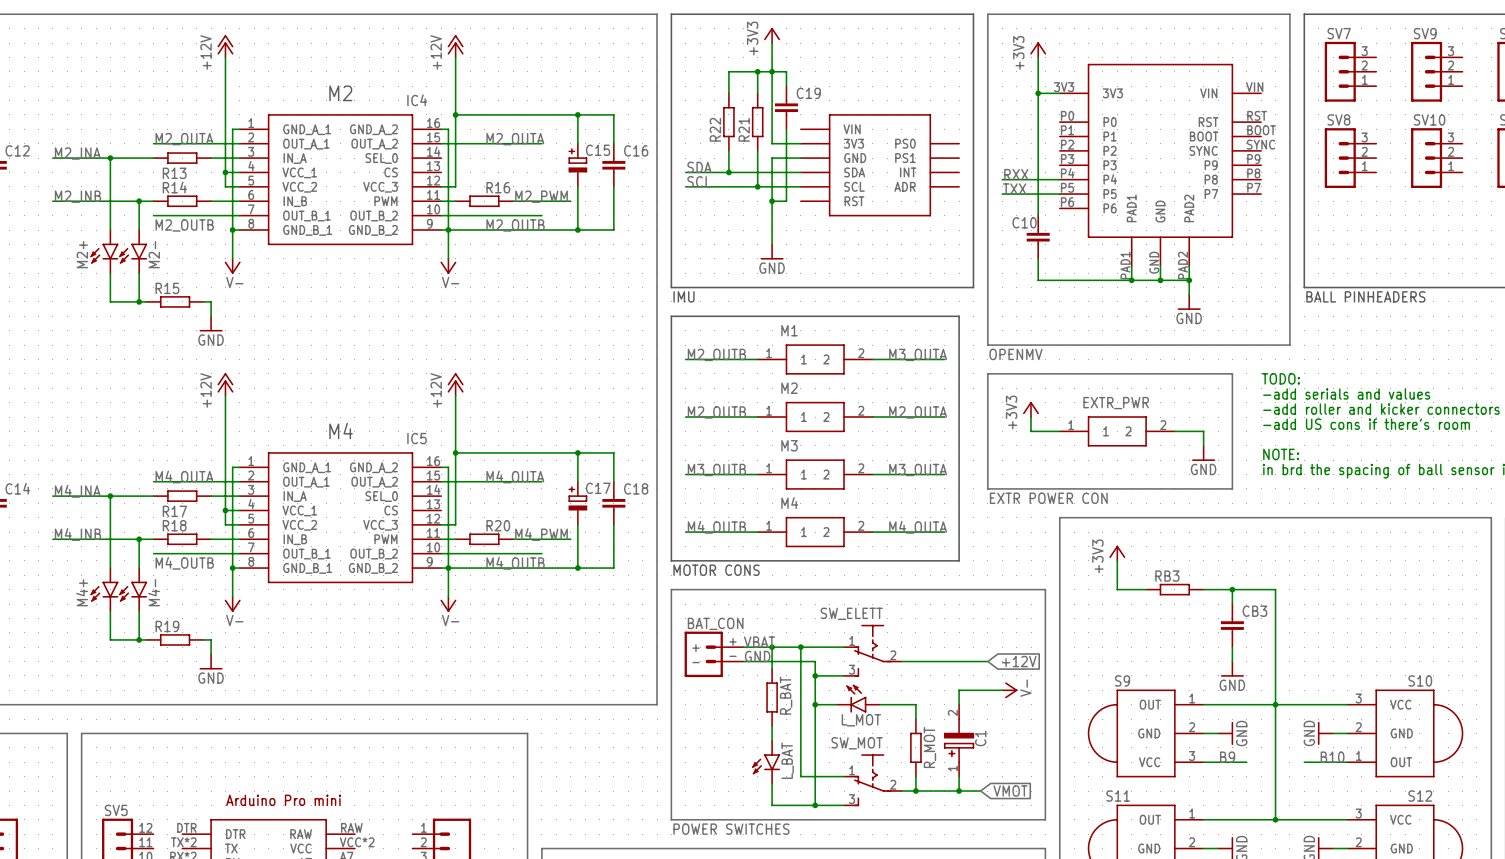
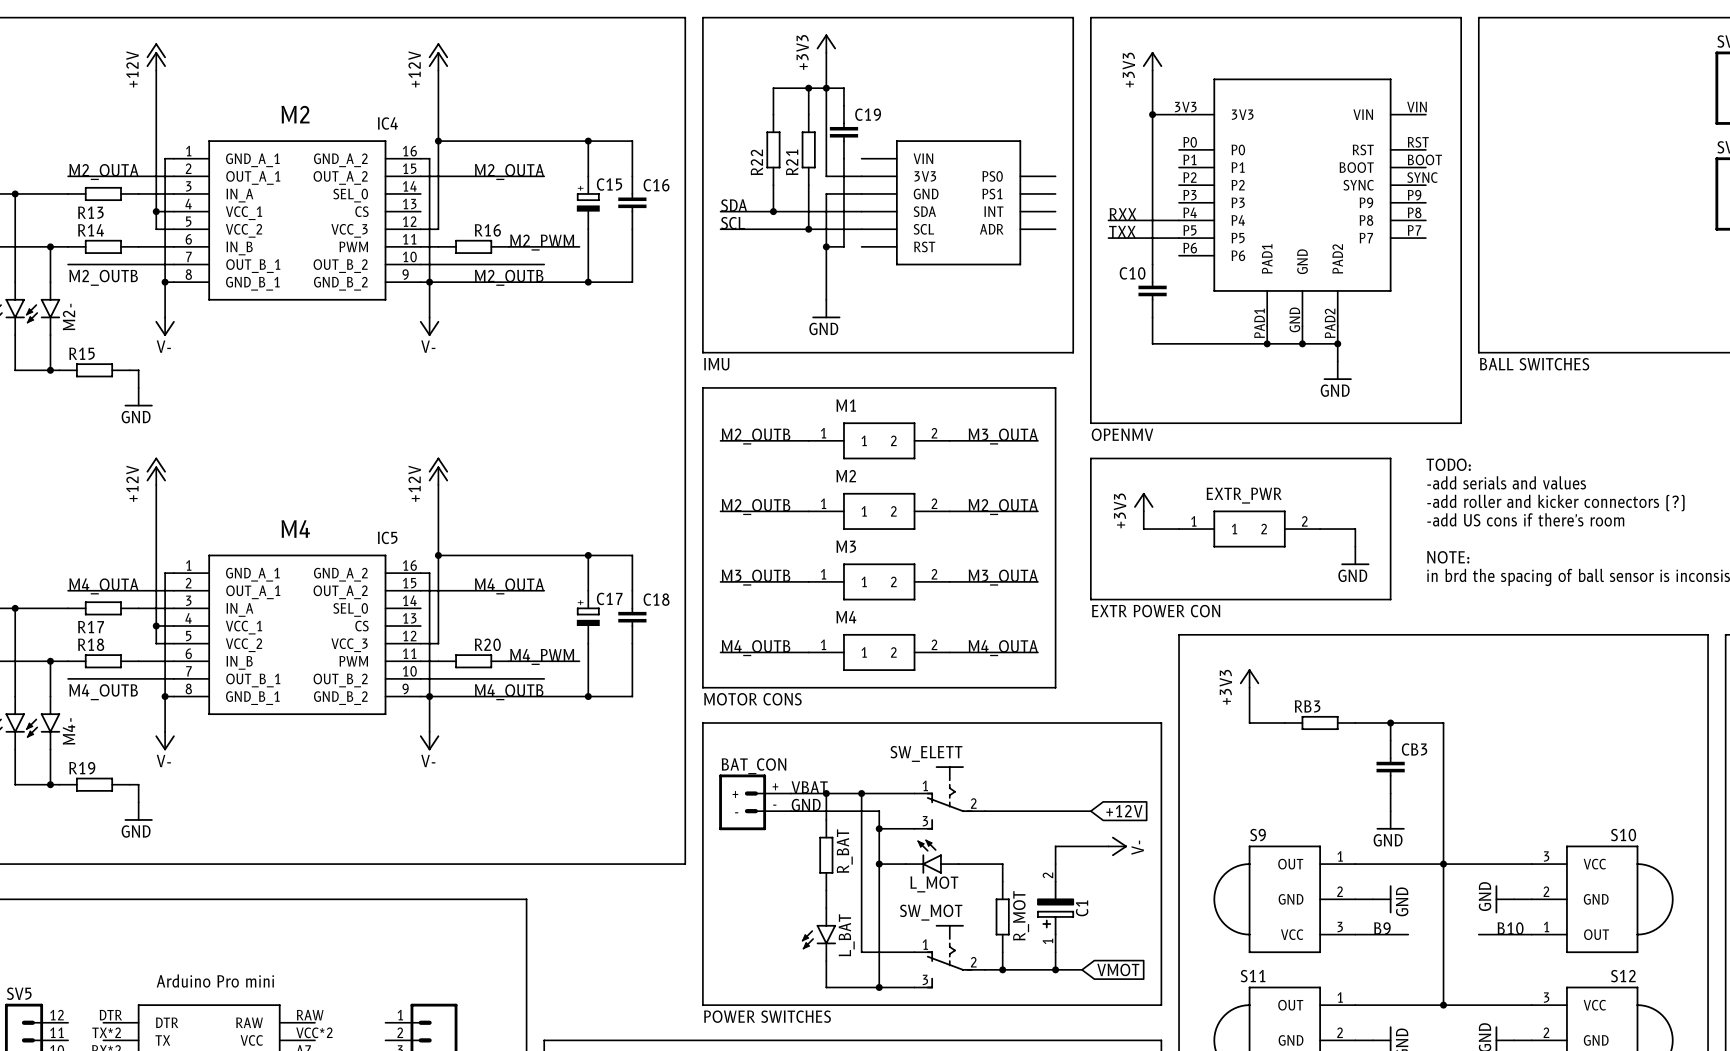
SV7: (1350, 71) -> none
SV9: (1436, 71) -> none
SV8: (1350, 158) -> none
SV10: (1436, 158) -> none
text: BALL PINHEADERS (1365, 296) -> BALL SWITCHES (1534, 364)

